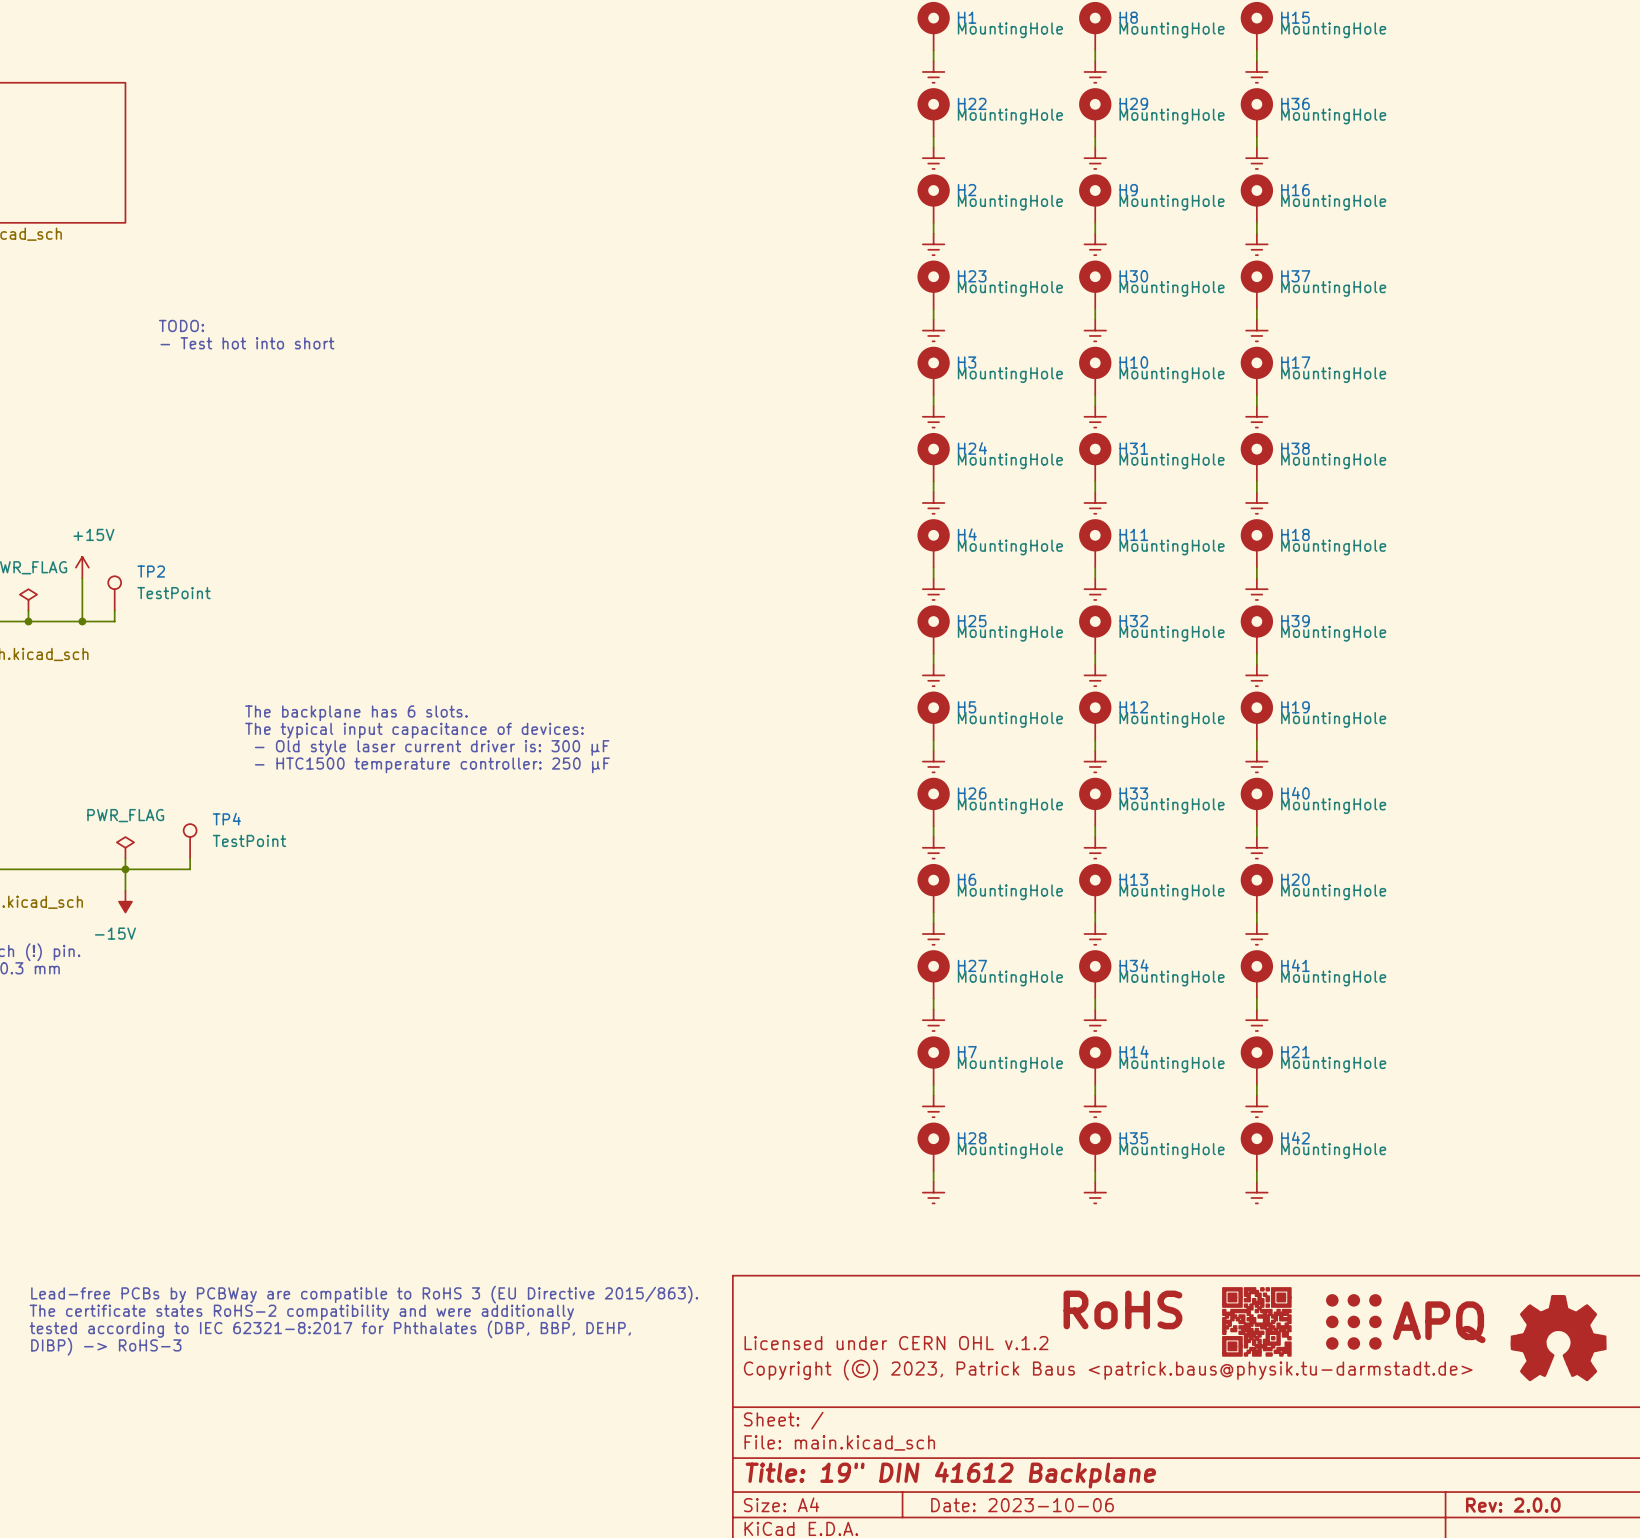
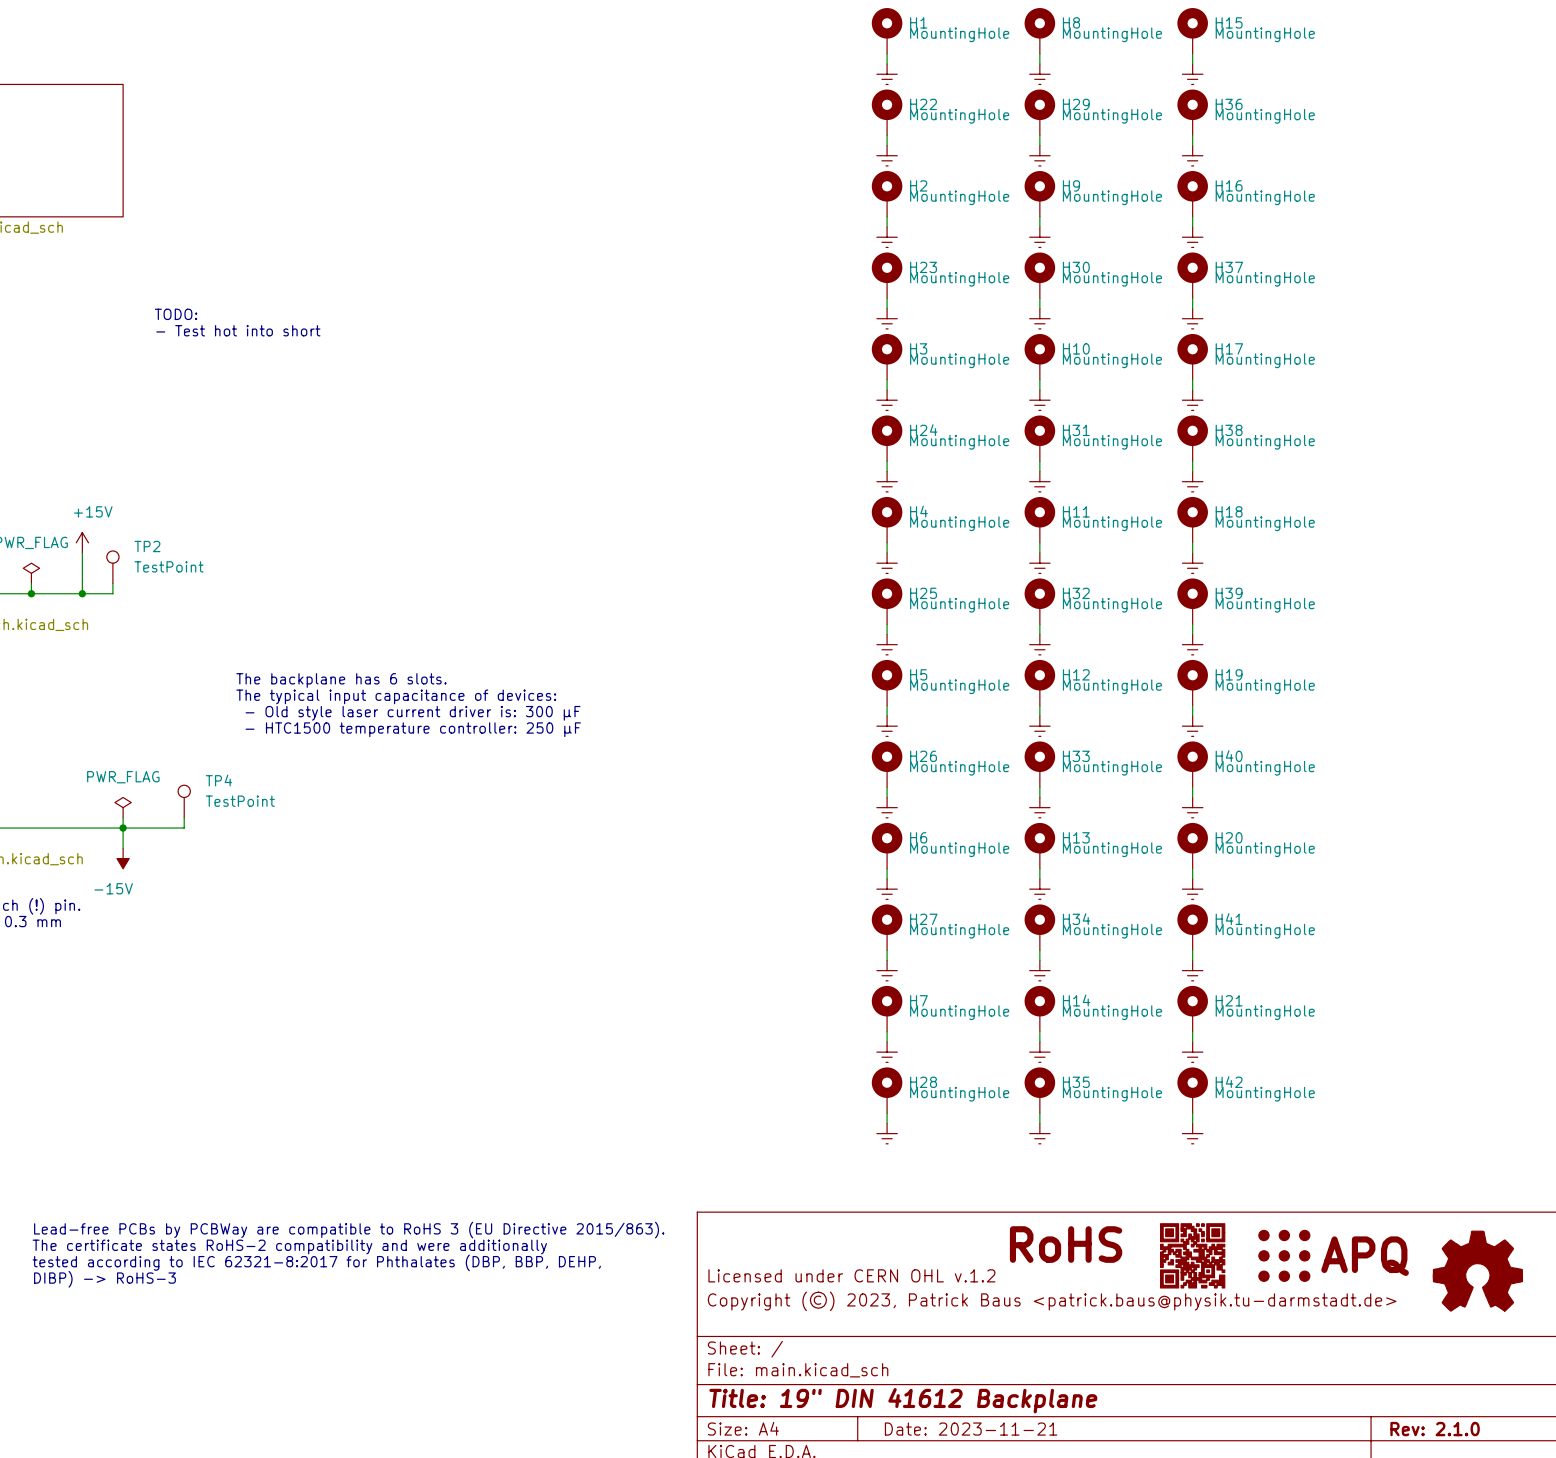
title block: Date: 2023-10-06 (1022, 1505) -> Date: 2023-11-21 (971, 1429)
title block: Rev: 2.0.0 (1513, 1505) -> Rev: 2.1.0 (1435, 1429)

